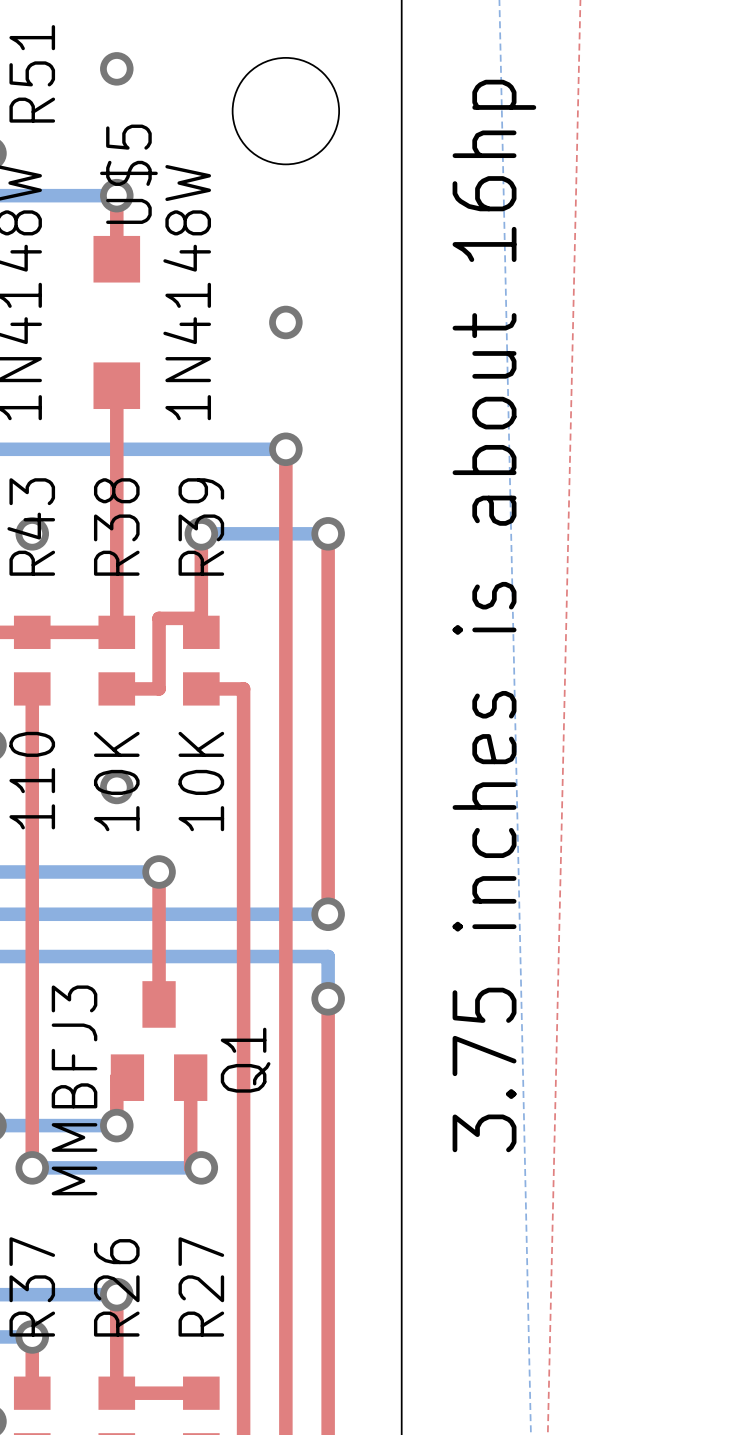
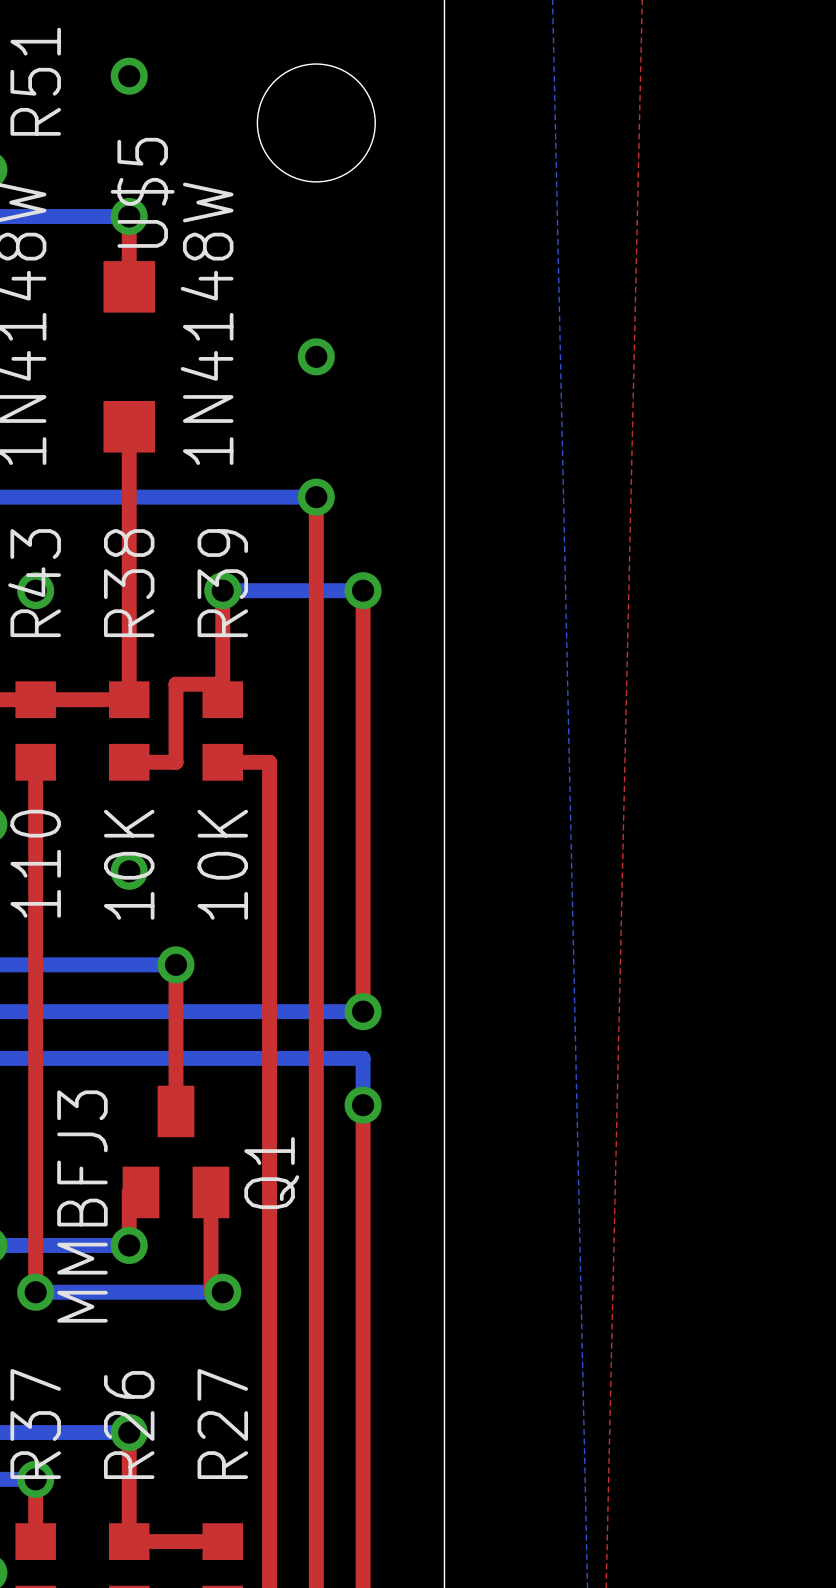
text: 3.75 inches is about 16hp (494, 615) -> none

